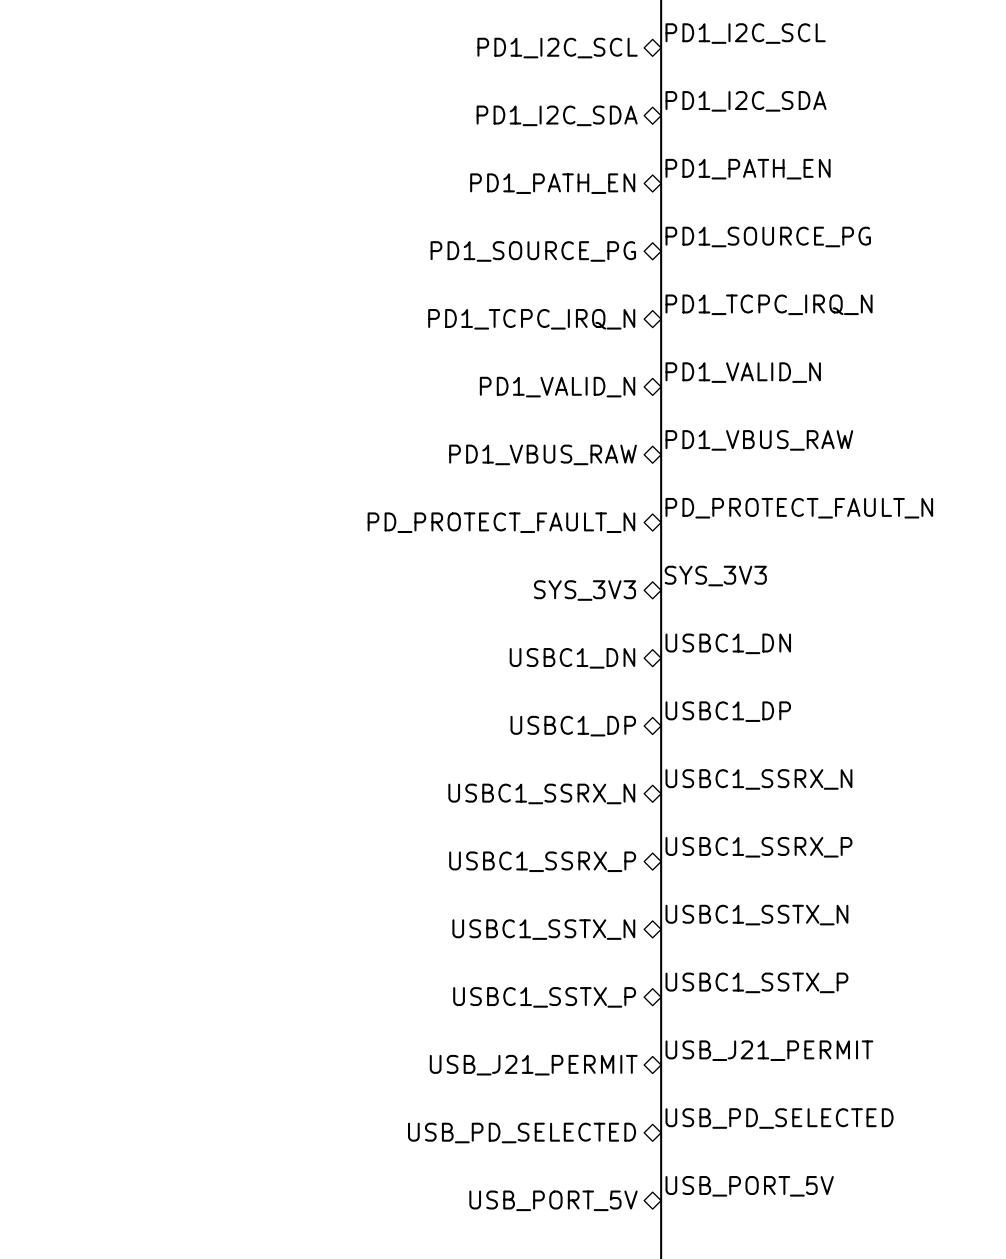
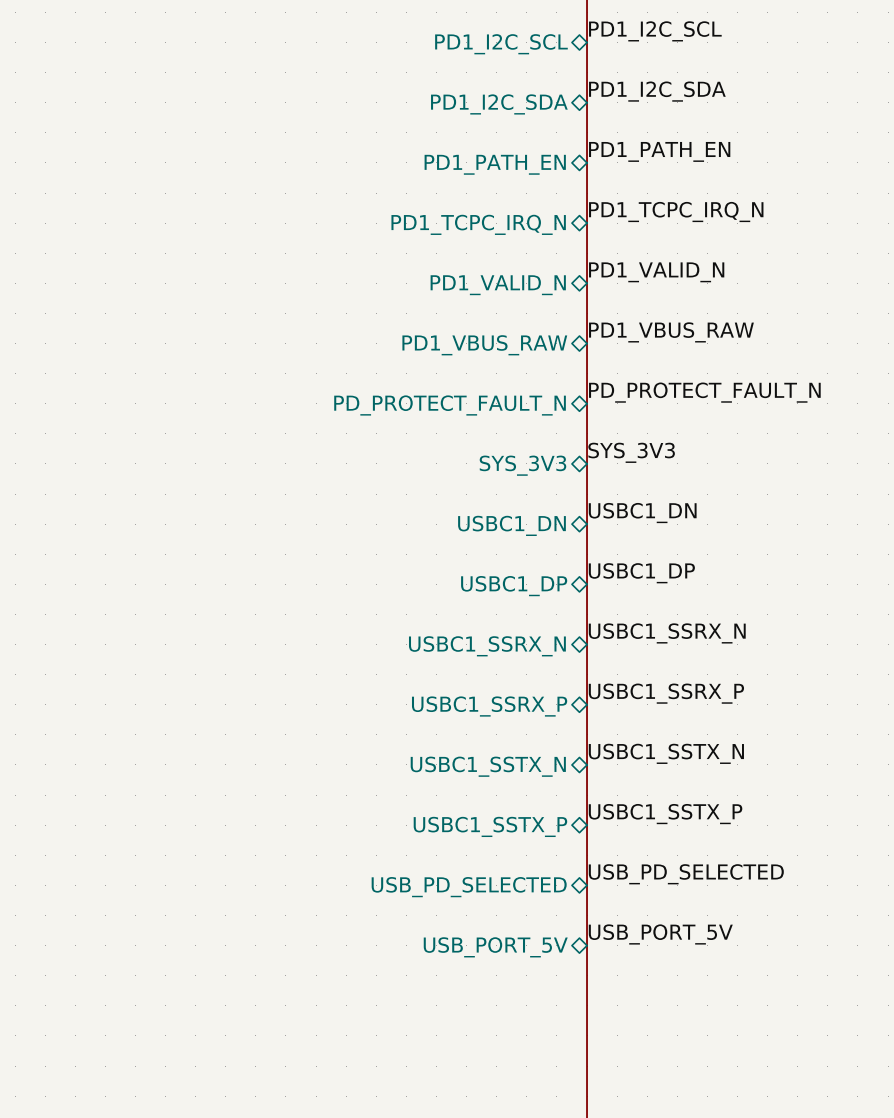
label: PD1_SOURCE_PG (768, 236) -> PD1_TCPC_IRQ_N (676, 211)
sheet pin: PD1_SOURCE_PG (533, 251) -> PD1_TCPC_IRQ_N (478, 224)
label: PD1_TCPC_IRQ_N (769, 304) -> PD1_VALID_N (656, 272)
sheet pin: PD1_TCPC_IRQ_N (531, 319) -> PD1_VALID_N (498, 285)
label: PD1_VALID_N (743, 372) -> PD1_VBUS_RAW (671, 332)
sheet pin: PD1_VALID_N (557, 387) -> PD1_VBUS_RAW (484, 345)
label: PD1_VBUS_RAW (759, 440) -> PD_PROTECT_FAULT_N (704, 392)
sheet pin: PD1_VBUS_RAW (543, 454) -> PD_PROTECT_FAULT_N (450, 405)
label: PD_PROTECT_FAULT_N (799, 508) -> SYS_3V3 (631, 452)
sheet pin: PD_PROTECT_FAULT_N (501, 522) -> SYS_3V3 (522, 465)
label: SYS_3V3 (715, 576) -> USBC1_DN (642, 513)
sheet pin: SYS_3V3 (584, 590) -> USBC1_DN (511, 525)
label: USBC1_DN (728, 643) -> USBC1_DP (641, 573)
sheet pin: USBC1_DN (572, 658) -> USBC1_DP (514, 586)
label: USBC1_DP (728, 711) -> USBC1_SSRX_N (667, 633)
sheet pin: USBC1_DP (573, 726) -> USBC1_SSRX_N (487, 646)
label: USBC1_SSRX_N (758, 779) -> USBC1_SSRX_P (666, 693)
sheet pin: USBC1_SSRX_N (541, 793) -> USBC1_SSRX_P (489, 706)
label: USBC1_SSRX_P (758, 847) -> USBC1_SSTX_N (666, 753)
sheet pin: USBC1_SSRX_P (542, 861) -> USBC1_SSTX_N (488, 766)
label: USBC1_SSTX_N (756, 915) -> USBC1_SSTX_P (665, 814)
sheet pin: USBC1_SSTX_N (543, 929) -> USBC1_SSTX_P (490, 826)
label: USBC1_SSTX_P (756, 982) -> USB_PD_SELECTED (686, 874)
sheet pin: USBC1_SSTX_P (544, 997) -> USB_PD_SELECTED (469, 887)
label: USB_J21_PERMIT (769, 1050) -> USB_PORT_5V (660, 934)
sheet pin: USB_J21_PERMIT (533, 1065) -> USB_PORT_5V (495, 947)
label: USB_PD_SELECTED (779, 1118) -> none
sheet pin: USB_PD_SELECTED (522, 1133) -> none
label: USB_PORT_5V (749, 1186) -> none
sheet pin: USB_PORT_5V (553, 1200) -> none

